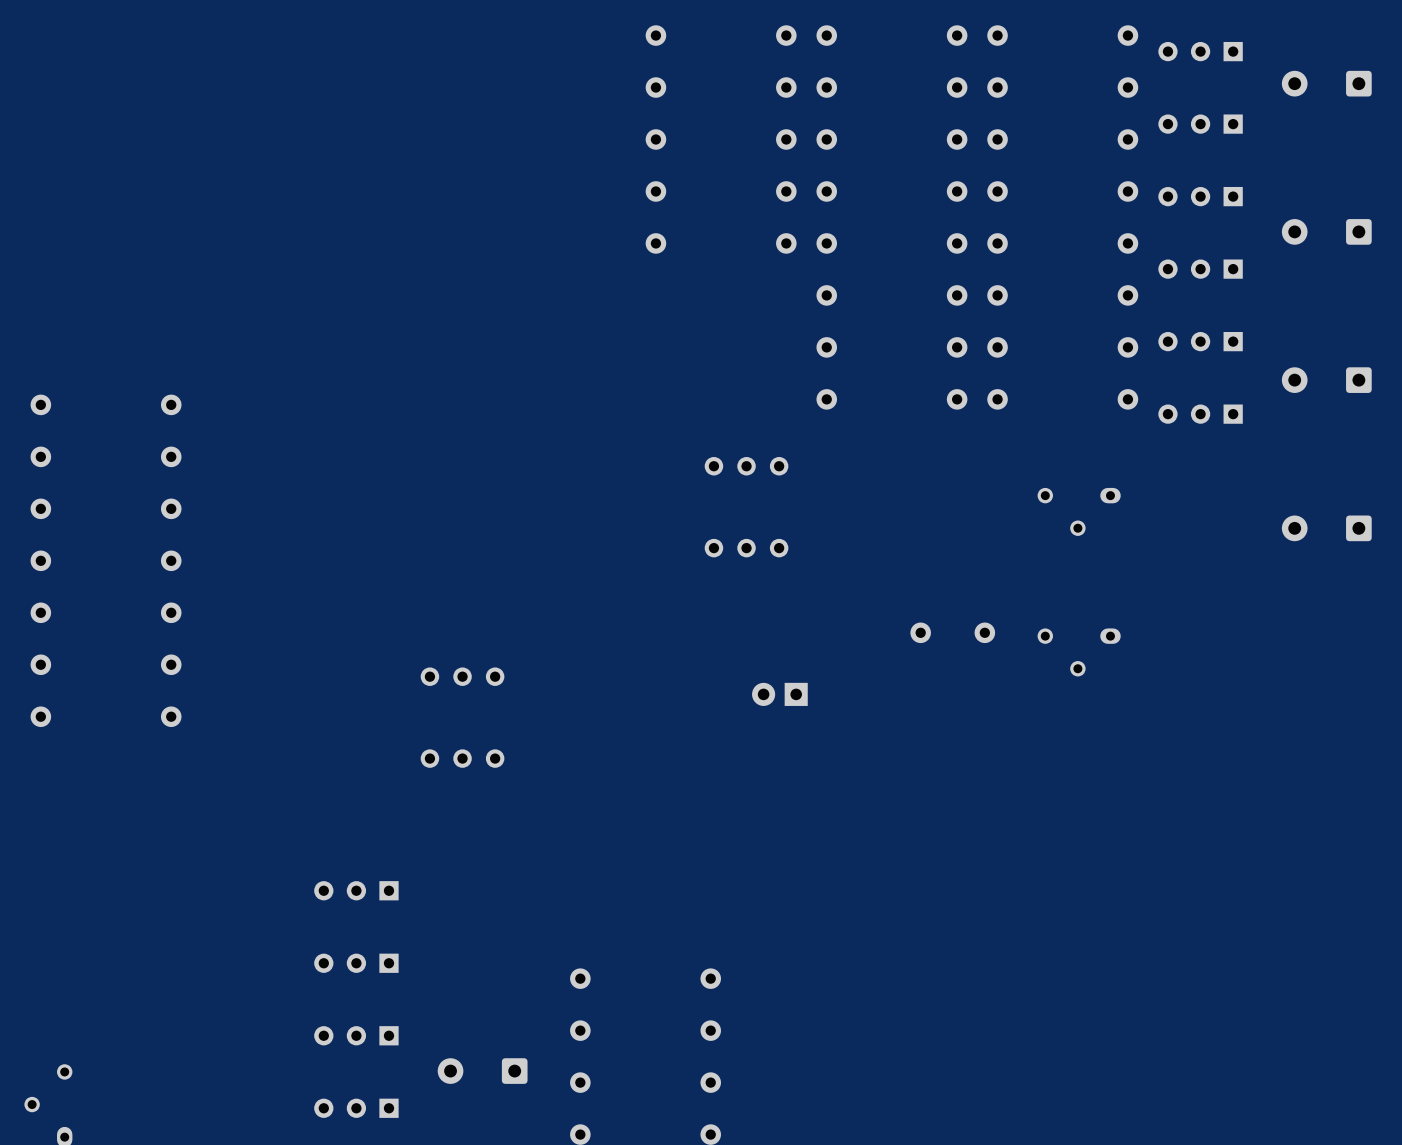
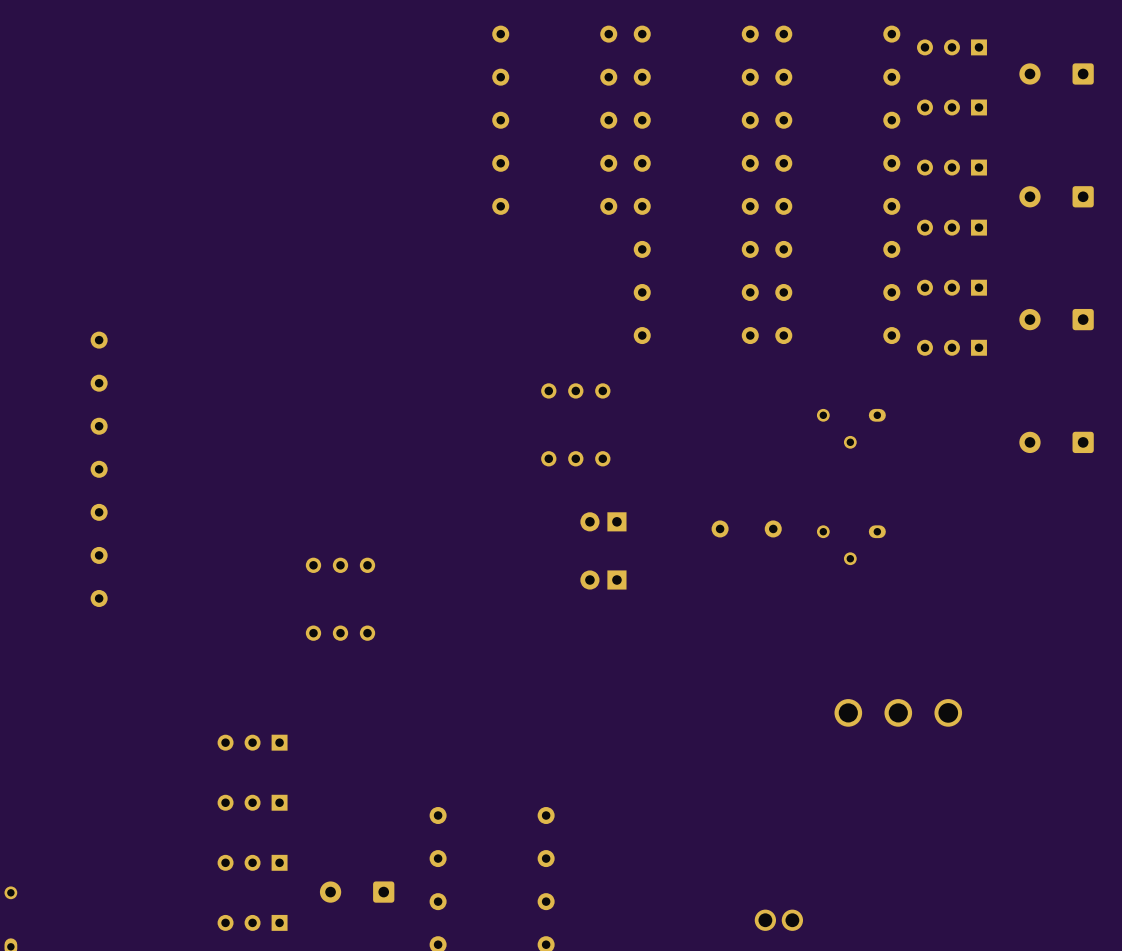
part: none -> (603, 521)
part: none -> (898, 712)
part: none -> (778, 920)

